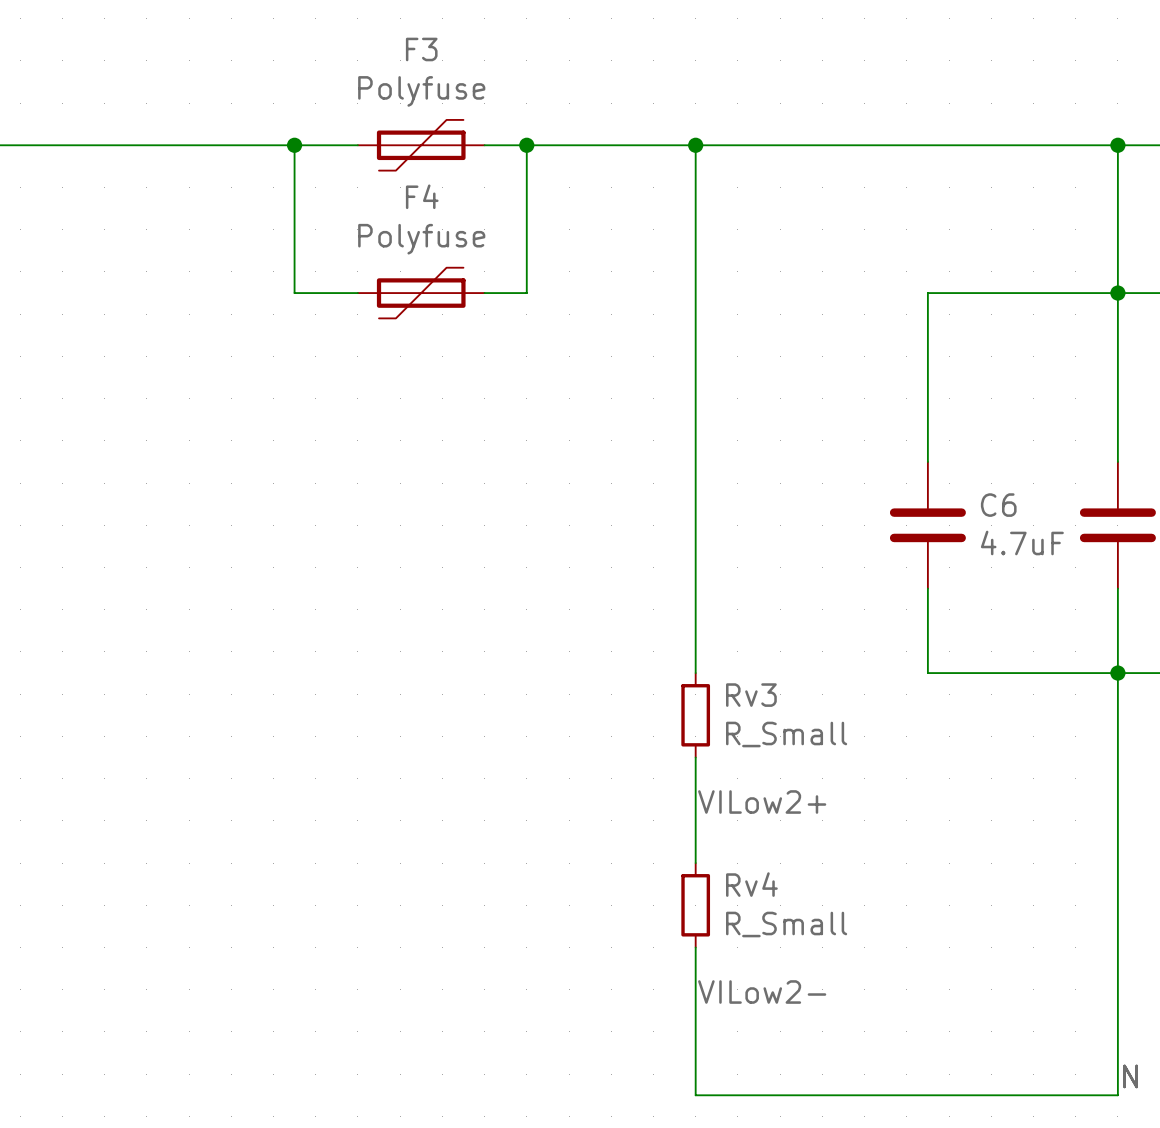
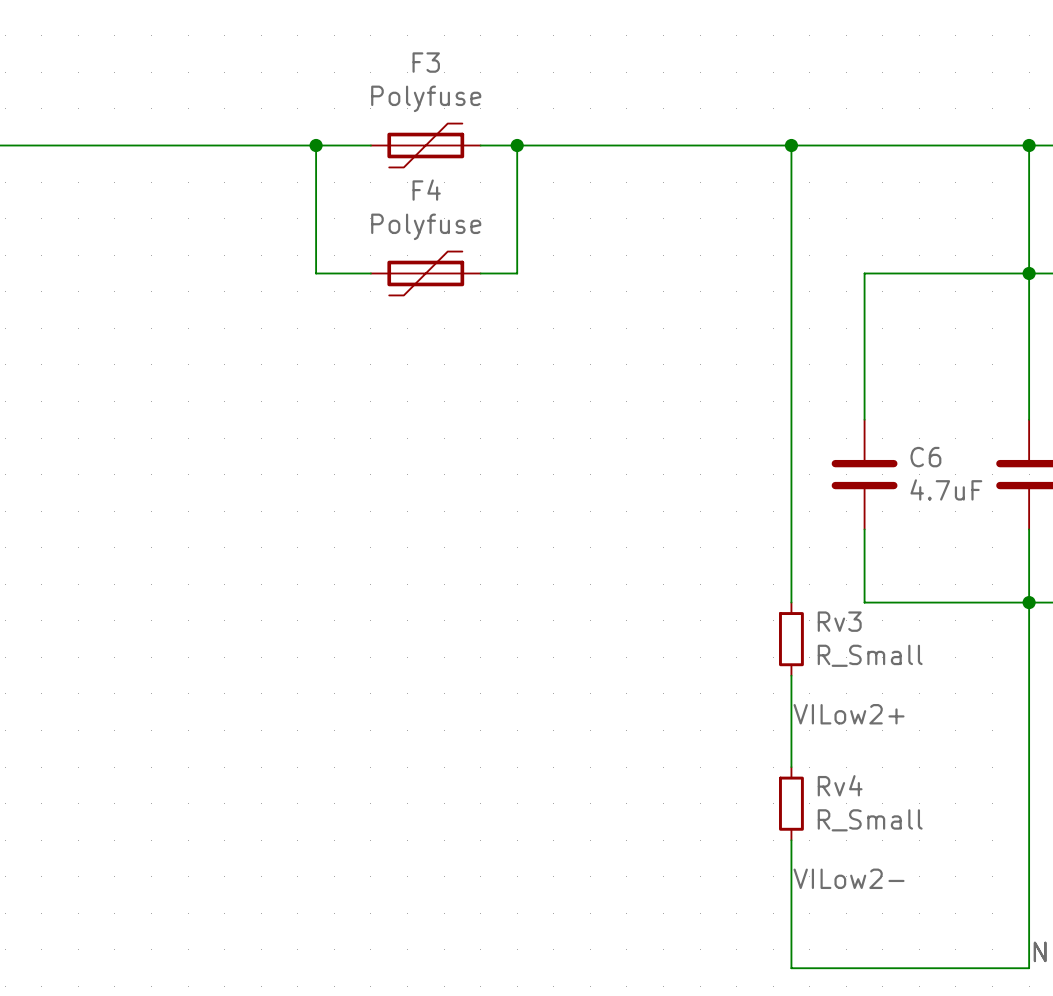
wire: (695, 145) (695, 673) -> (791, 145) (791, 602)
junction: (695, 145) -> none
junction: none -> (791, 145)
Rv3 position: (695, 715) -> (791, 639)
wire: (695, 757) (695, 863) -> (791, 675) (791, 767)
label position: VILow2+ (762, 802) -> VILow2+ (849, 714)
Rv4 position: (695, 905) -> (791, 803)
wire: (695, 947) (695, 1095) (843, 1095) -> (791, 840) (791, 968)
label position: VILow2- (762, 992) -> VILow2- (849, 878)

